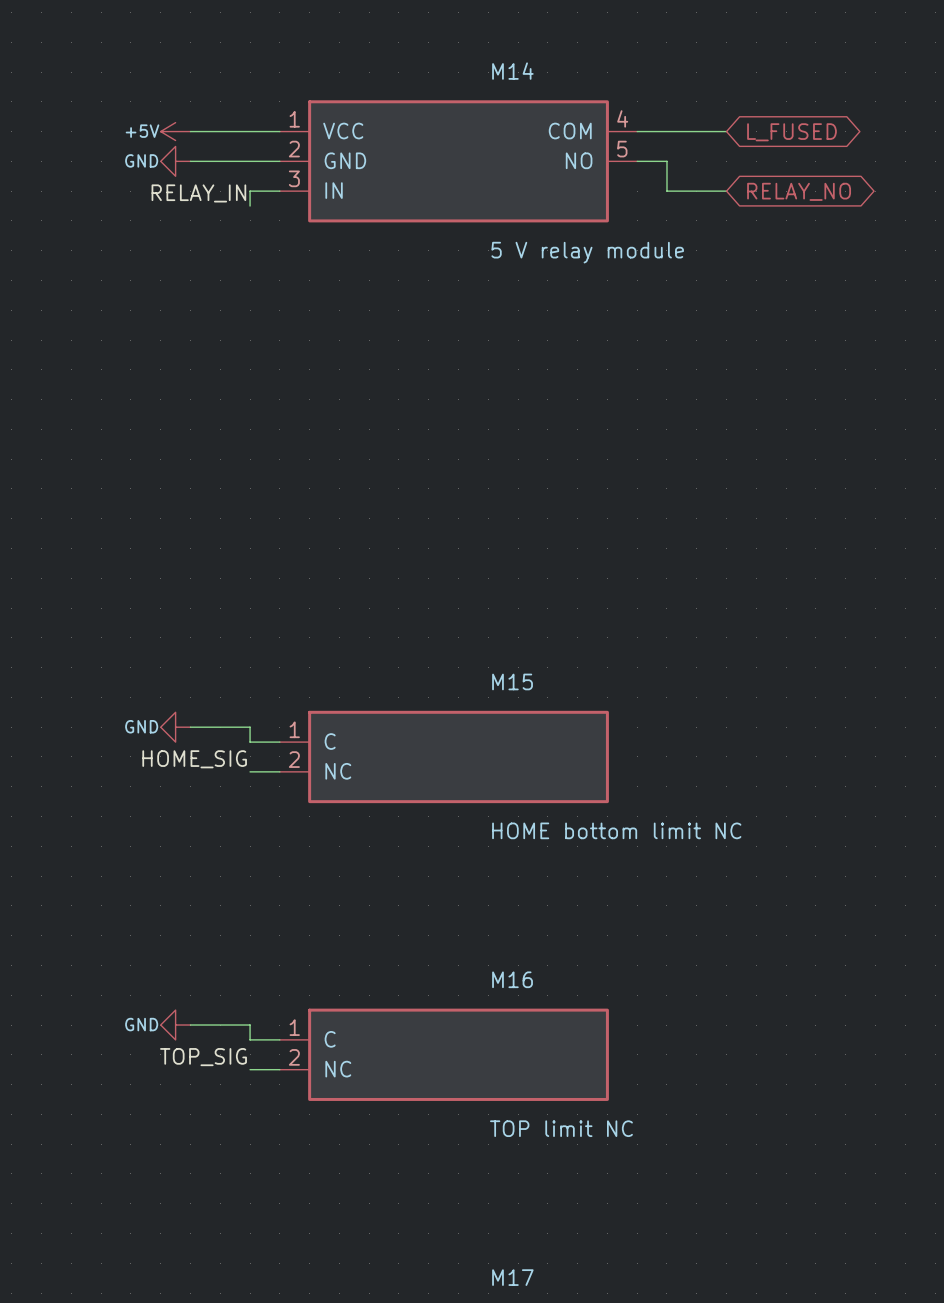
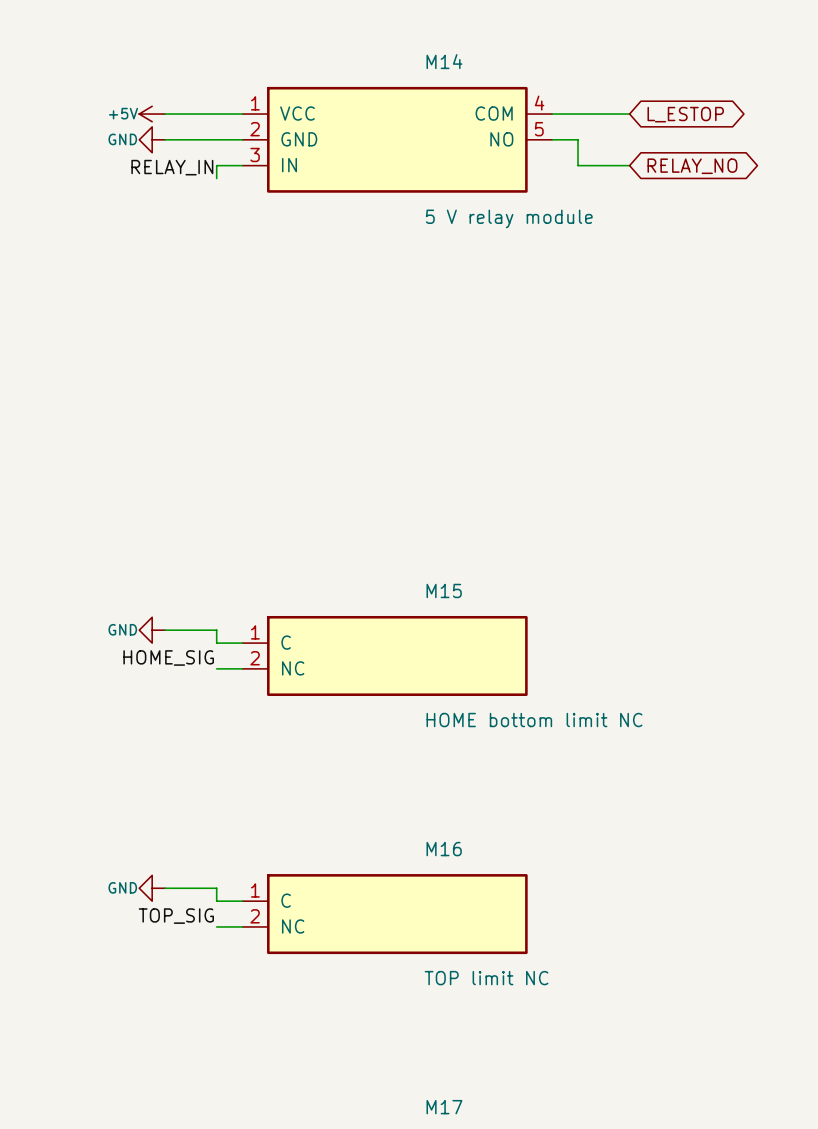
global label: L_FUSED (791, 132) -> L_ESTOP (685, 114)

